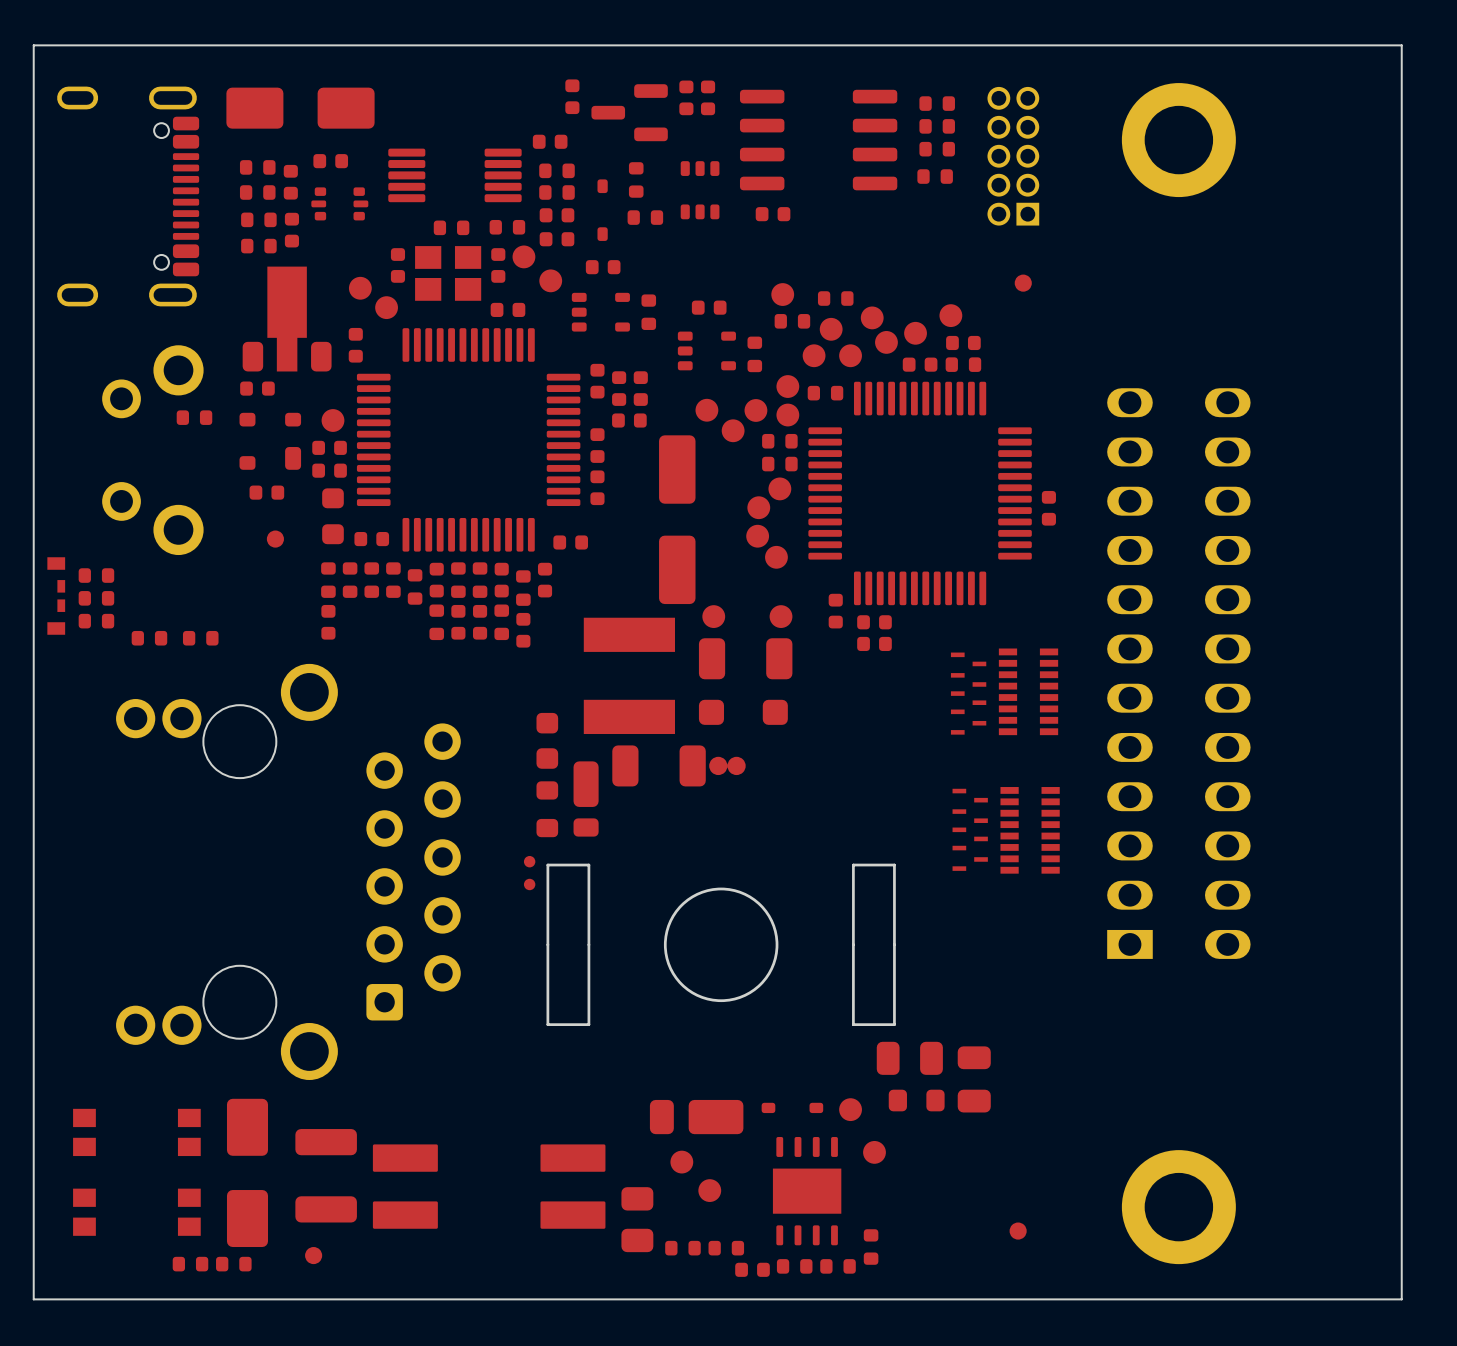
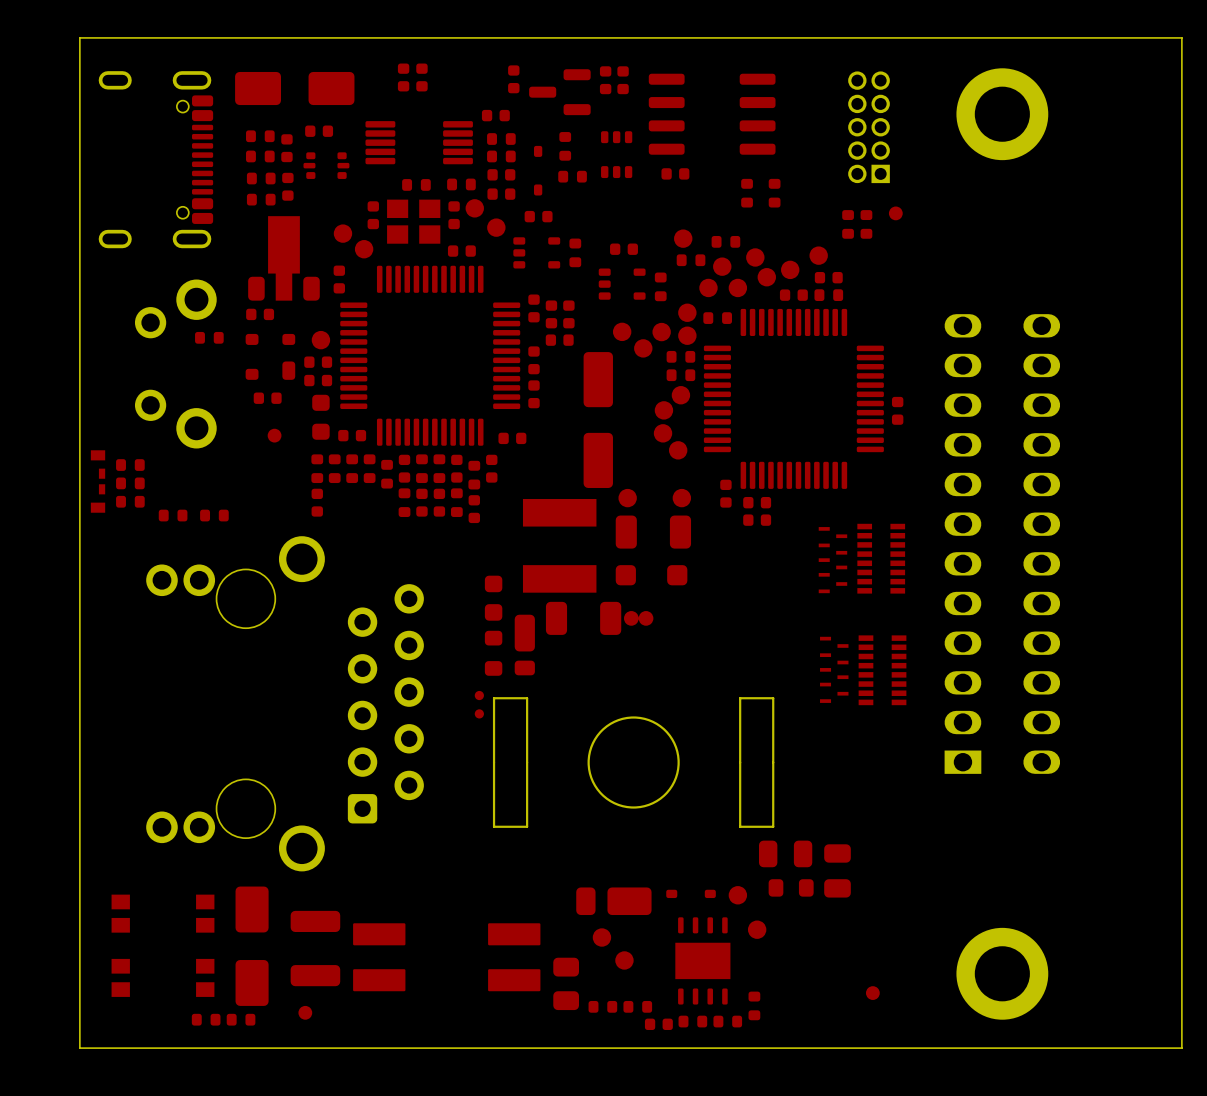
part: none -> (403, 77)
part: none -> (421, 77)
part: (937, 103) -> none
part: (937, 126) -> none
part: (937, 149) -> none
part: (935, 176) -> none
part: none -> (747, 193)
part: none -> (774, 193)
part: none -> (895, 213)
part footprint: [1014, 274, 1032, 292] -> [860, 210, 873, 239]
part: none -> (848, 224)

